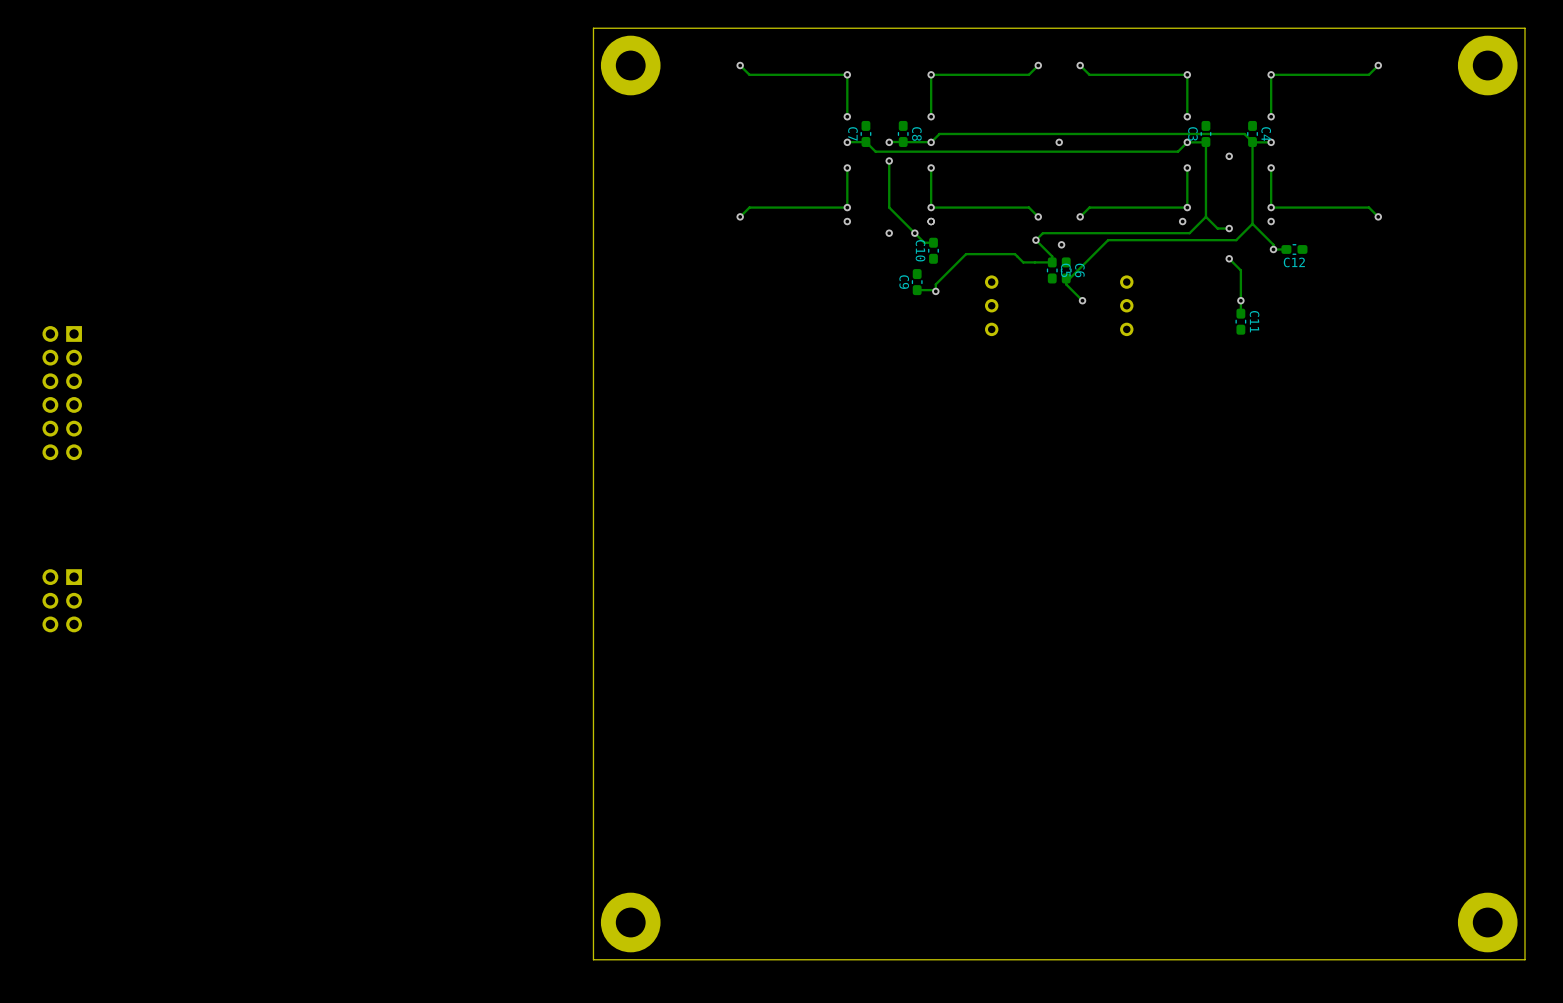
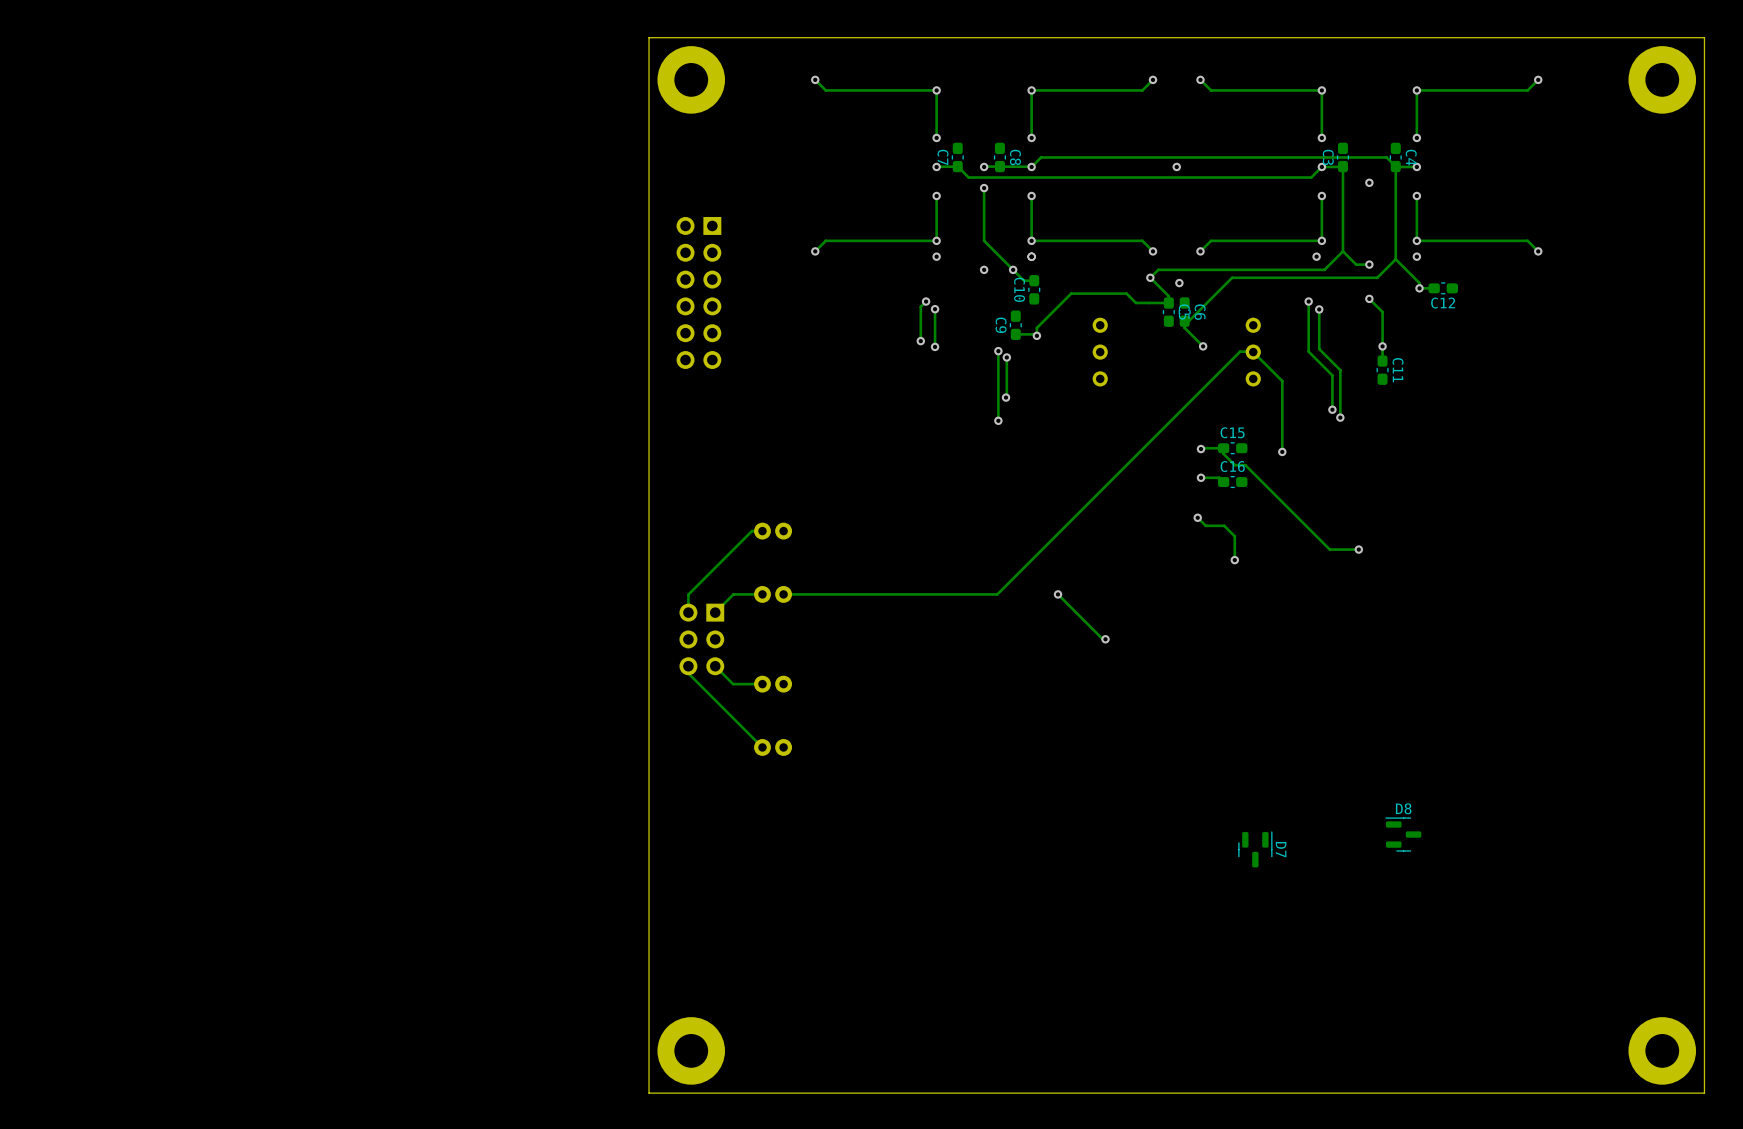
part: none -> (698, 292)
track: none -> (926, 301) (920, 306) (920, 341)
via: none -> (926, 301)
track: none -> (1308, 301) (1308, 351) (1332, 375) (1332, 409)
via: none -> (1308, 301)
track: none -> (935, 309) (935, 346)
via: none -> (935, 309)
track: none -> (1319, 309) (1319, 349) (1340, 370) (1340, 417)
via: none -> (1319, 309)
via: none -> (920, 341)
via: none -> (935, 346)
track: none -> (998, 351) (998, 420)
via: none -> (998, 351)
track: none -> (1006, 357) (1006, 397)
via: none -> (1006, 357)
via: none -> (1006, 397)
via: none -> (1332, 409)
via: none -> (1340, 417)
via: none -> (998, 420)
C15: none -> (1232, 448)
track: none -> (1201, 449) (1223, 448) (1223, 453) (1234, 465) (1245, 465) (1329, 549) (1358, 549)
via: none -> (1201, 449)
part: (62, 393) -> none
track: none -> (1282, 451) (1282, 381) (1252, 351) (1240, 351) (997, 594) (783, 594)
via: none -> (1282, 451)
track: none -> (1201, 477) (1219, 477) (1223, 482)
via: none -> (1201, 477)
C16: none -> (1232, 482)
track: none -> (1197, 517) (1205, 525) (1224, 525) (1234, 536) (1234, 560)
via: none -> (1197, 517)
track: none -> (762, 531) (751, 531) (688, 594) (688, 612)
part: none -> (773, 531)
via: none -> (1358, 549)
via: none -> (1234, 560)
track: none -> (762, 594) (733, 594) (715, 612)
part: none -> (773, 594)
track: none -> (1058, 594) (1102, 639) (1105, 639)
via: none -> (1058, 594)
part: none -> (701, 639)
via: none -> (1105, 639)
track: none -> (688, 666) (688, 673) (762, 747)
track: none -> (715, 666) (733, 684) (762, 684)
part: none -> (773, 684)
part: (62, 600) -> none
part: none -> (773, 747)
D8: none -> (1403, 834)
D7: none -> (1255, 849)

